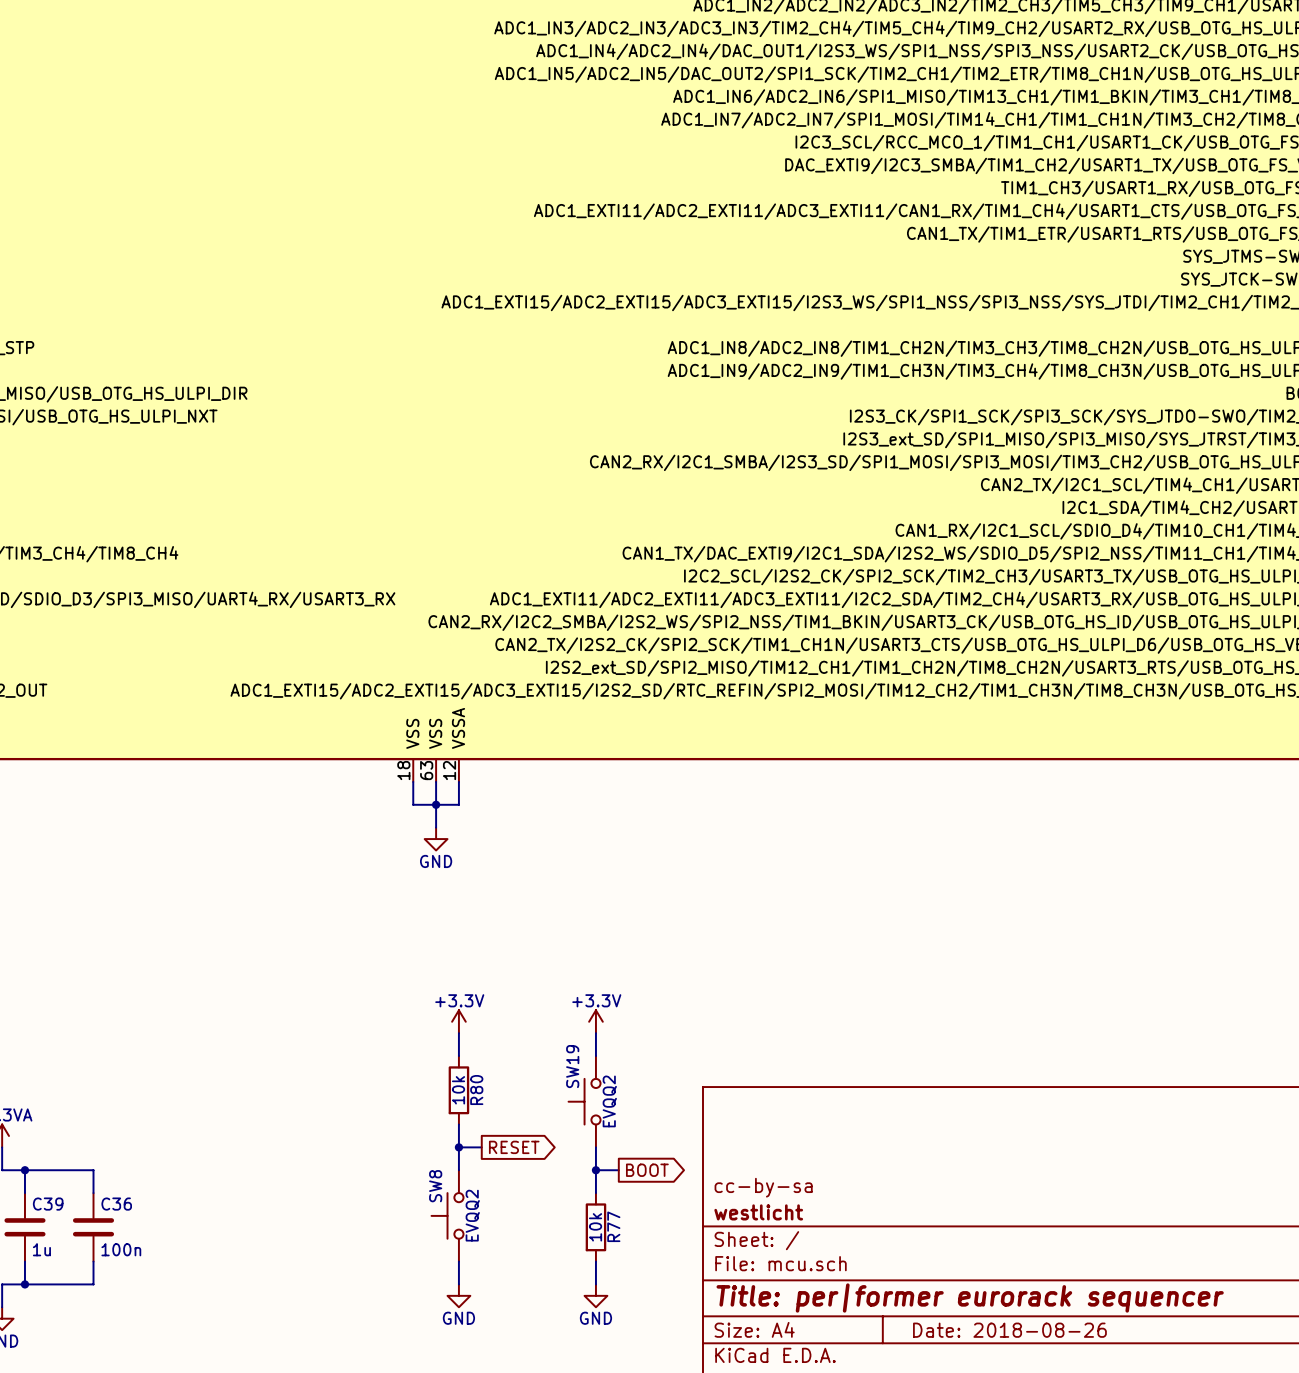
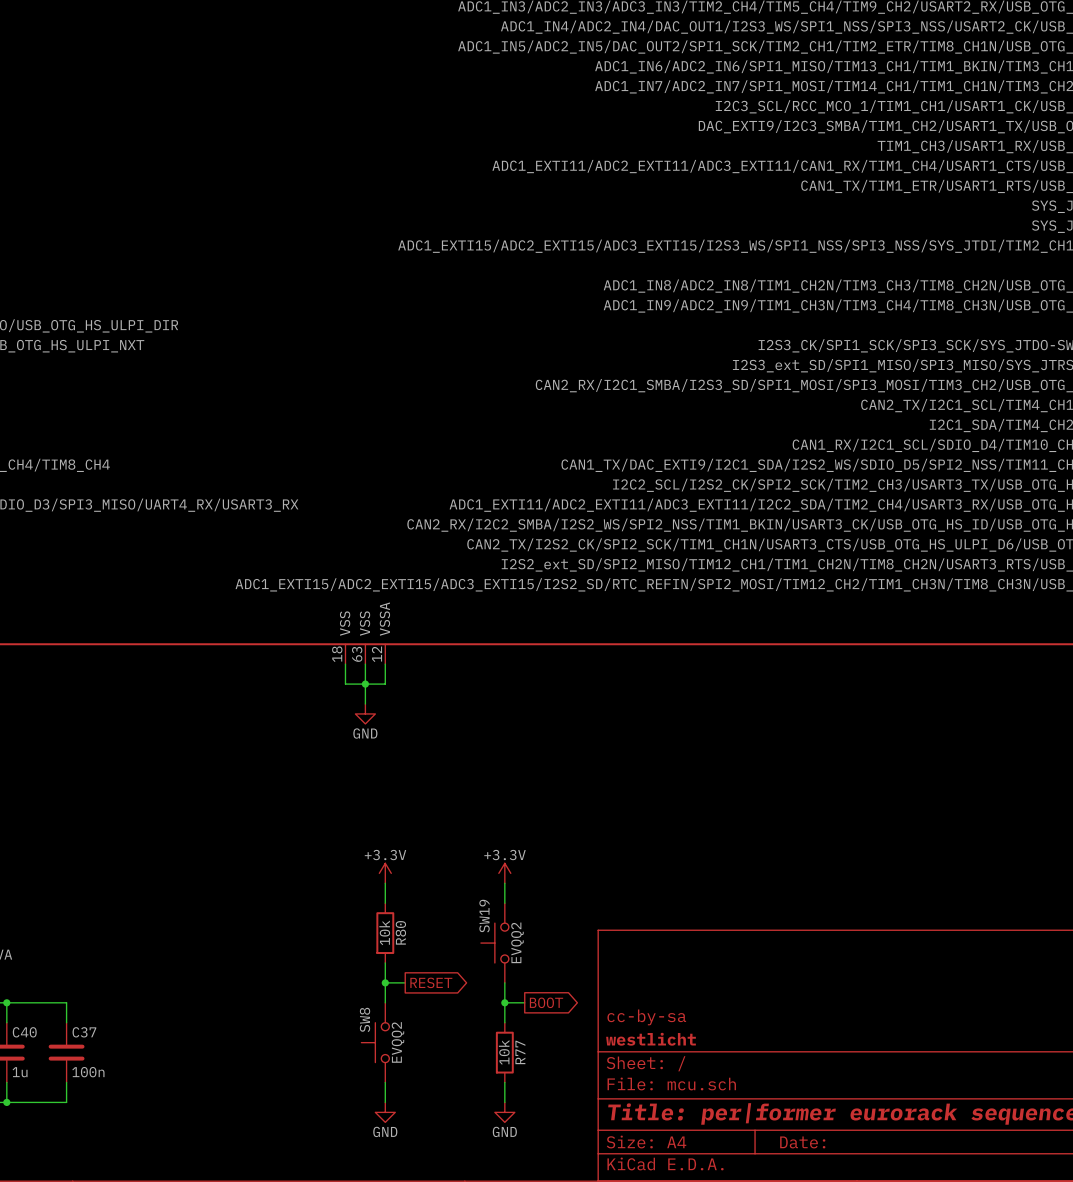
C39 name: C39 (48, 1204) -> C40 (24, 1032)
C36 name: C36 (116, 1204) -> C37 (84, 1032)
title block: Date: 2018-08-26 (1009, 1330) -> Date: (802, 1142)

